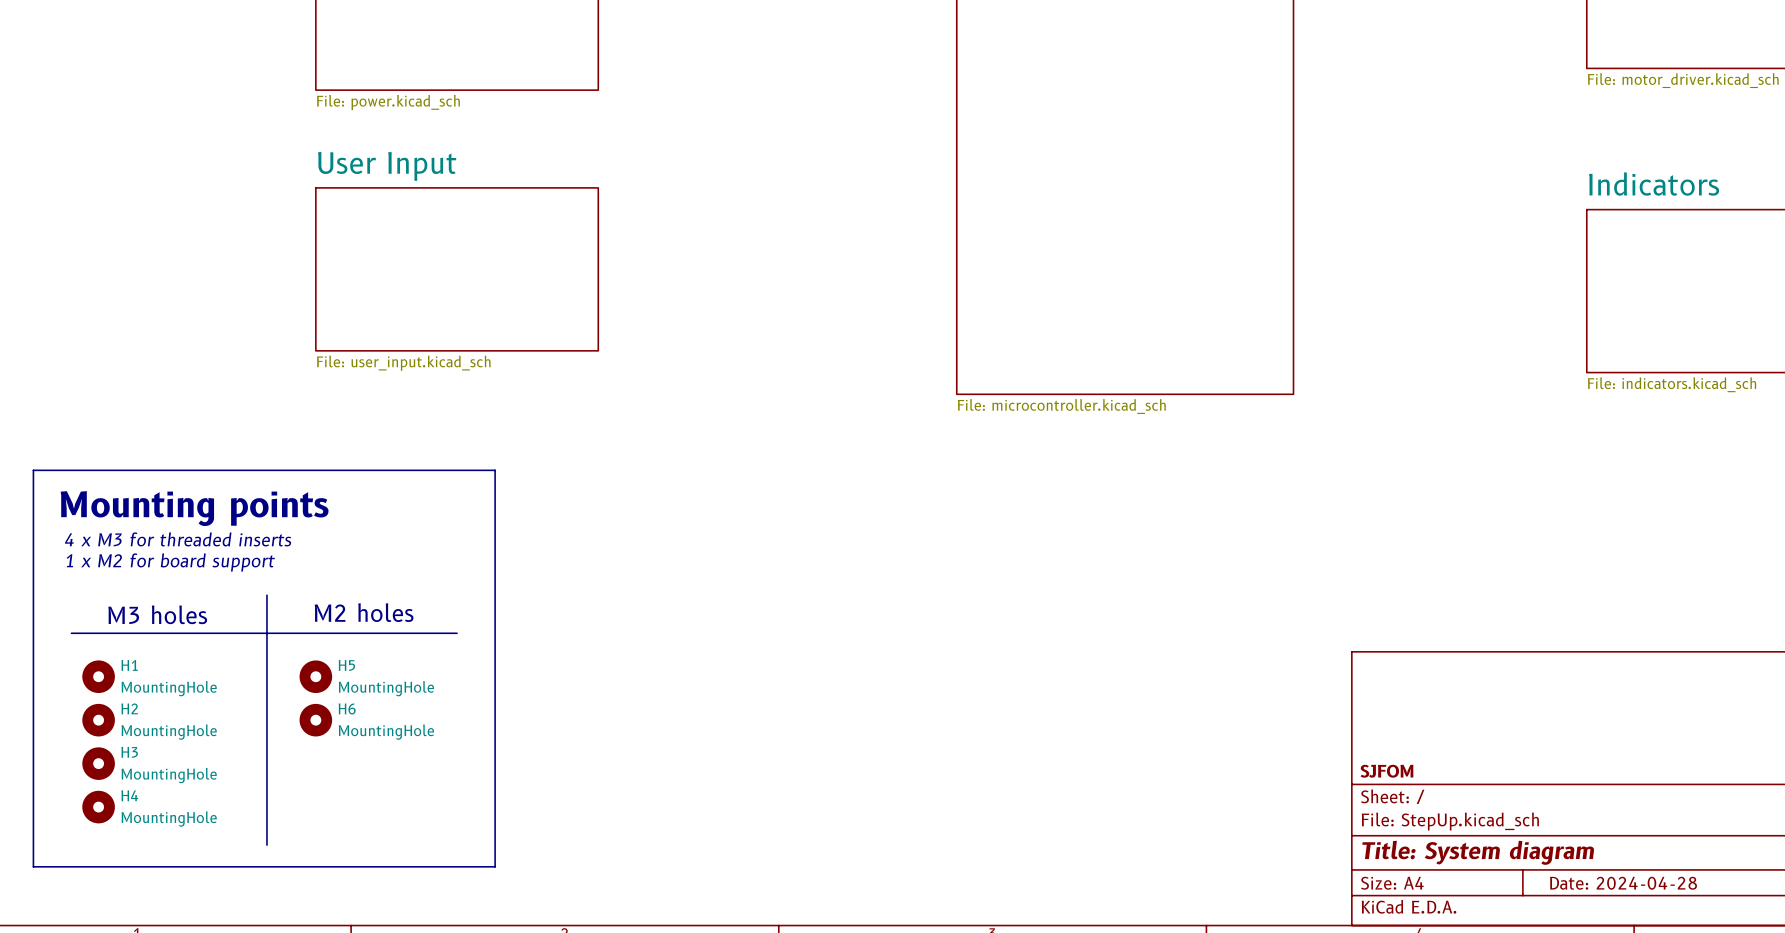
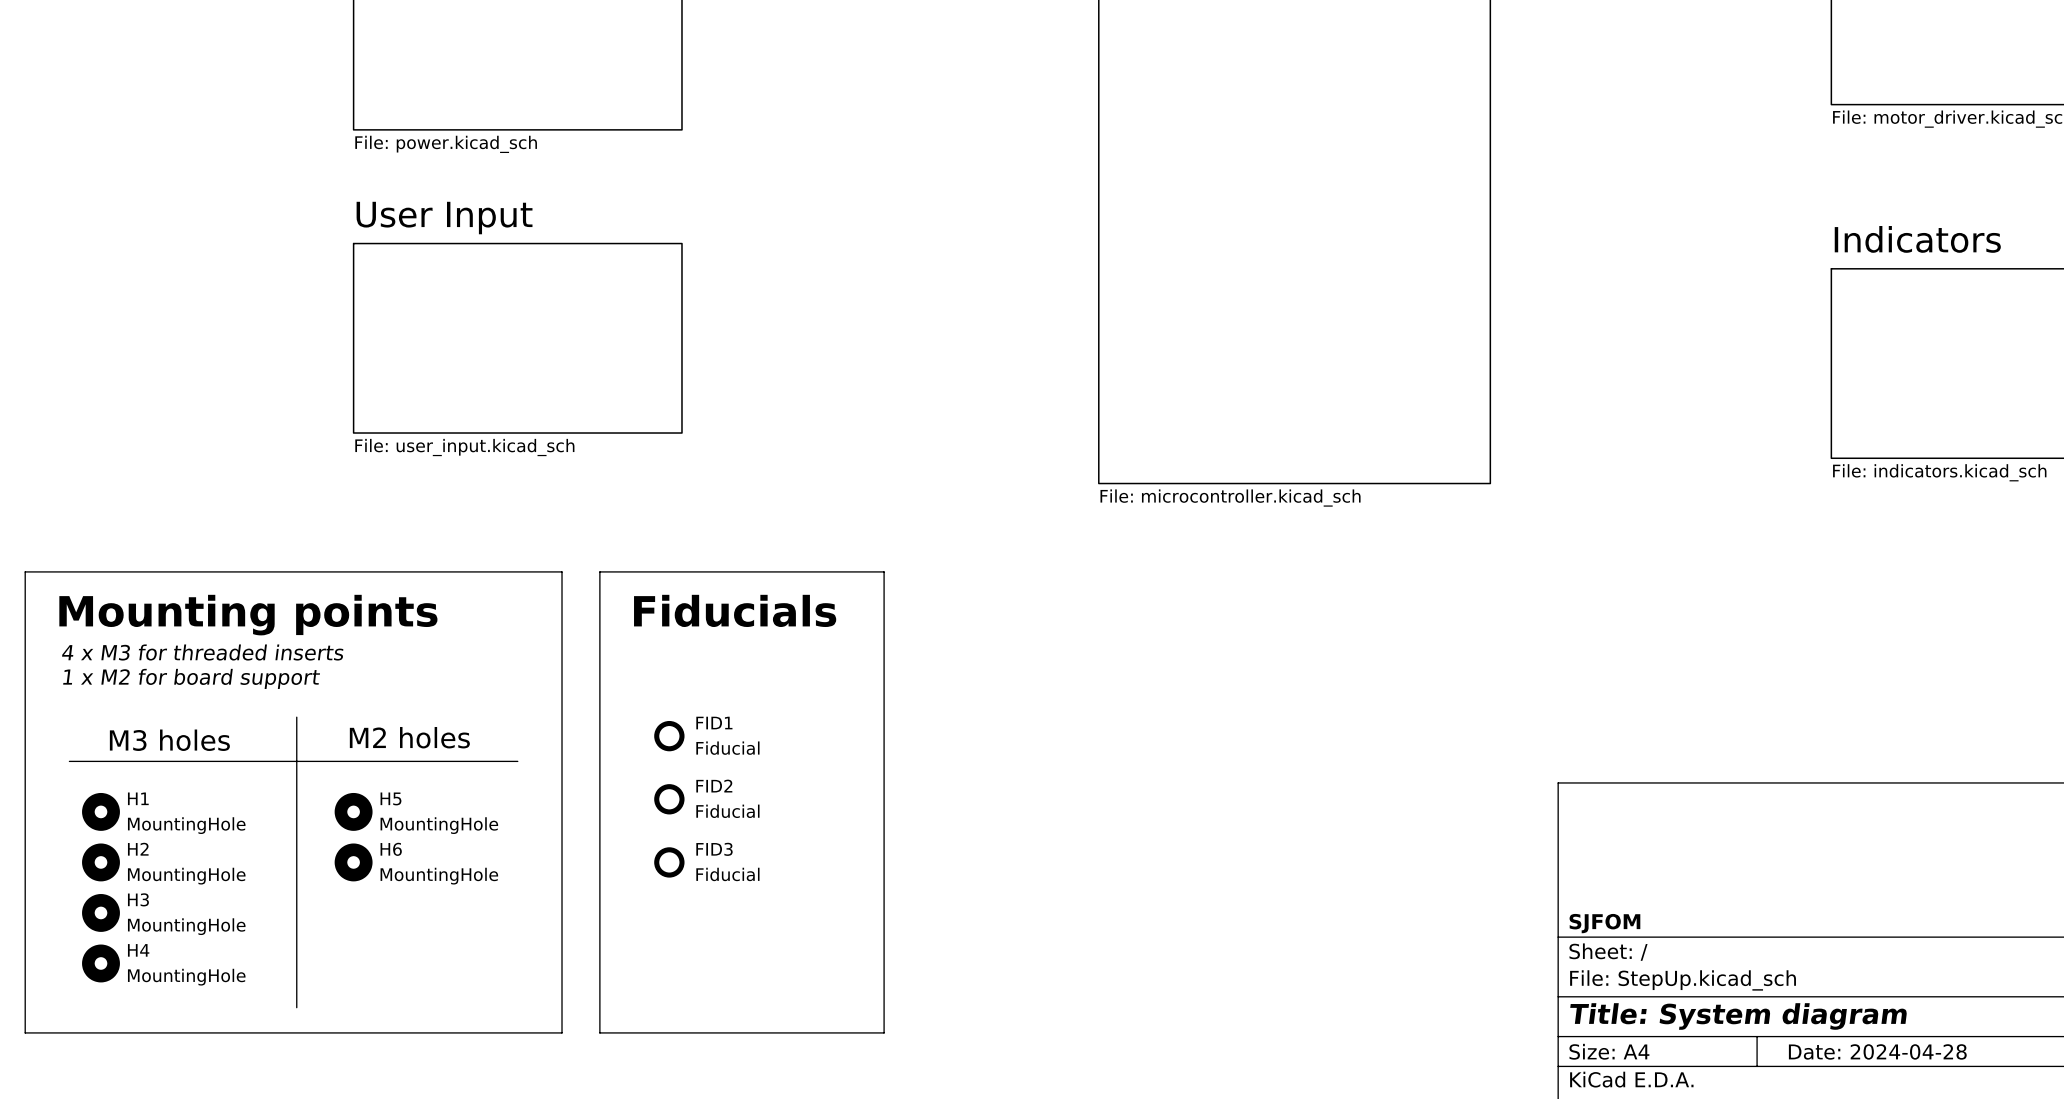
line: none -> (599, 571) (884, 571) (884, 1032) (599, 1032) (599, 571)
text: none -> Fiducials (735, 610)
FID1: none -> Fiducial (669, 736)
FID2: none -> Fiducial (669, 799)
FID3: none -> Fiducial (669, 862)

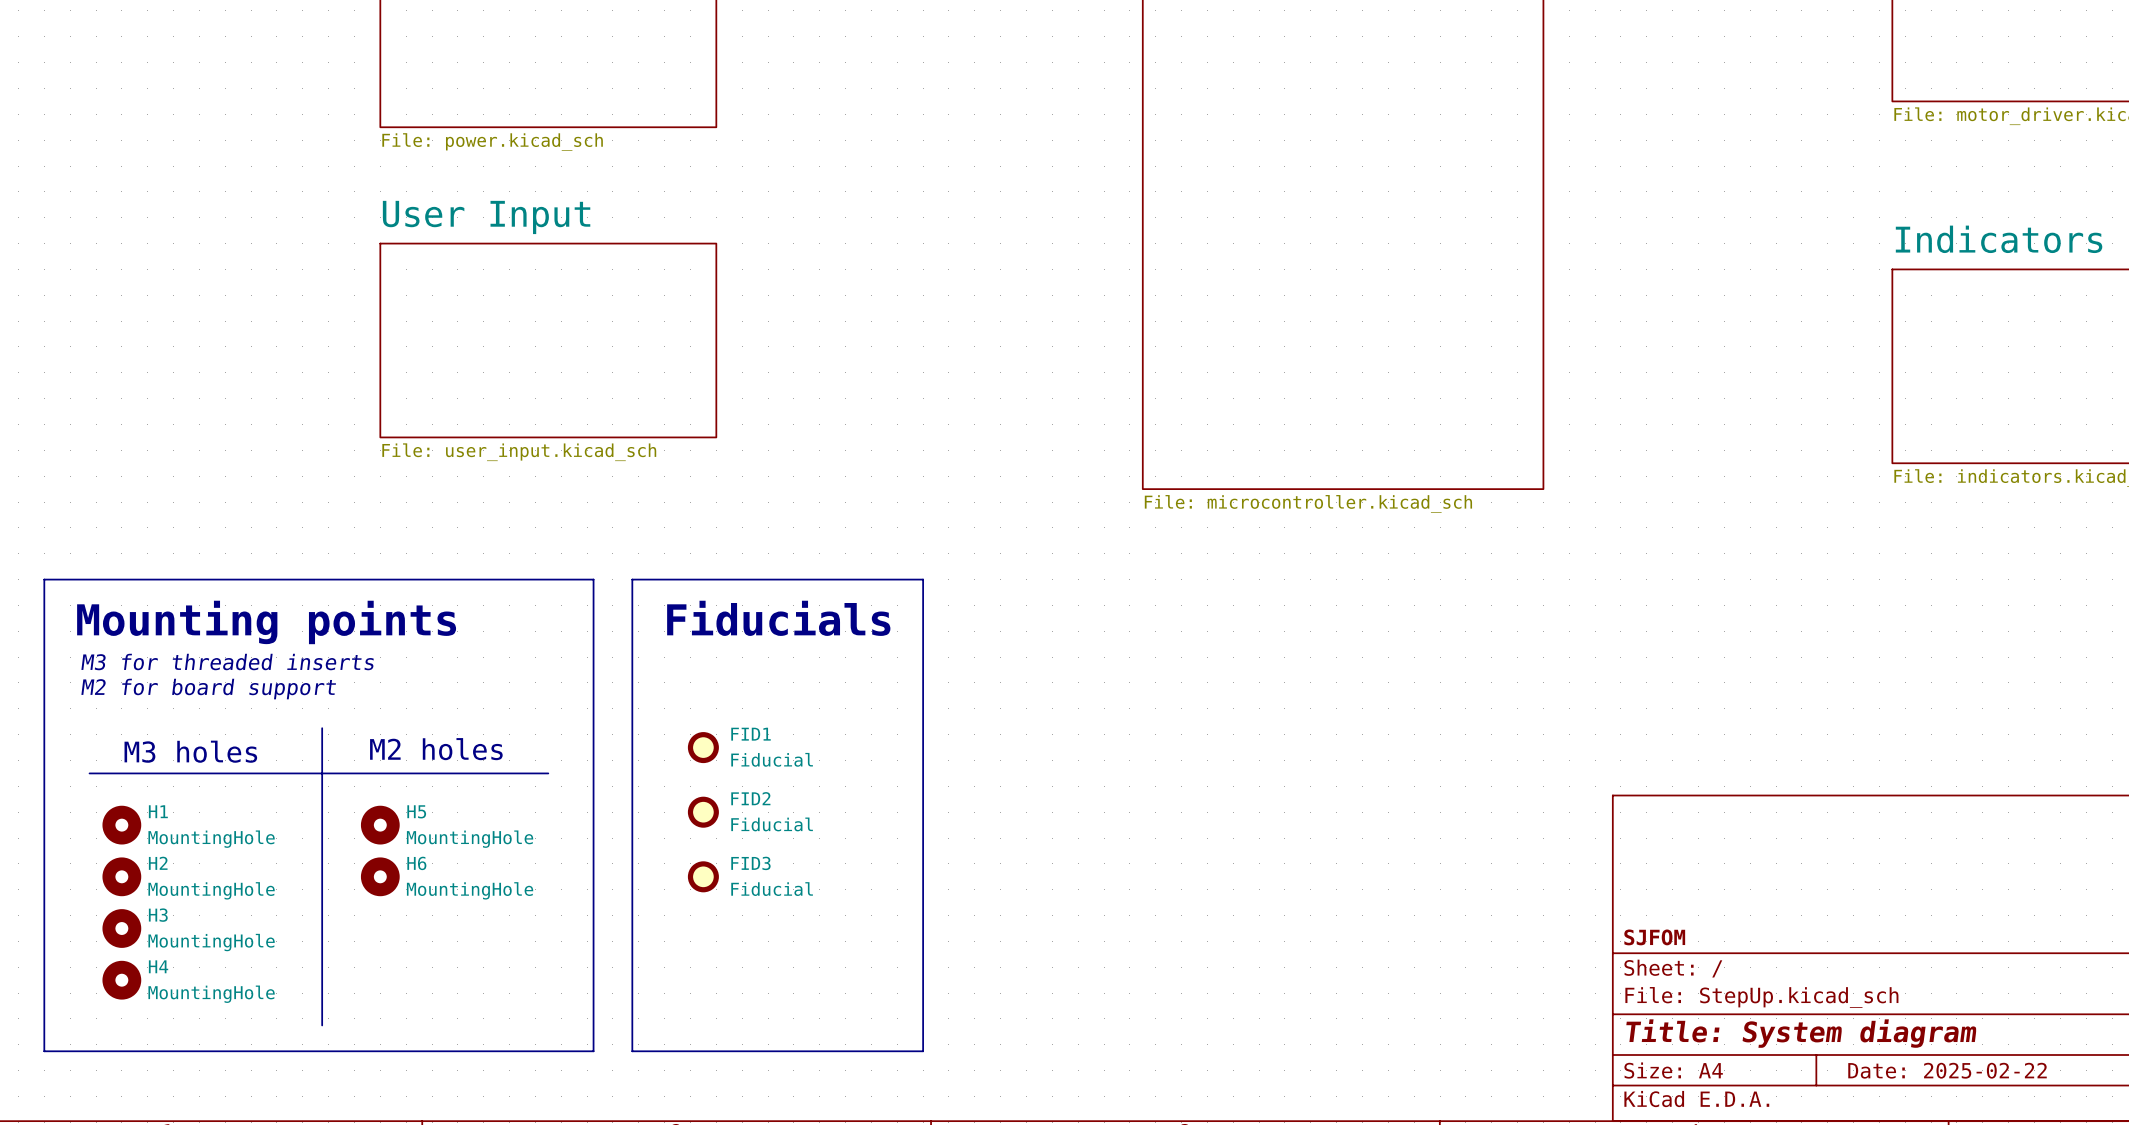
text: 4 x M3 for threaded inserts (202, 652) -> M3 for threaded inserts (227, 662)
text: 1 x M2 for board support (191, 678) -> M2 for board support (208, 689)
title block: Date: 2024-04-28 (1877, 1051) -> Date: 2025-02-22 (1947, 1070)

